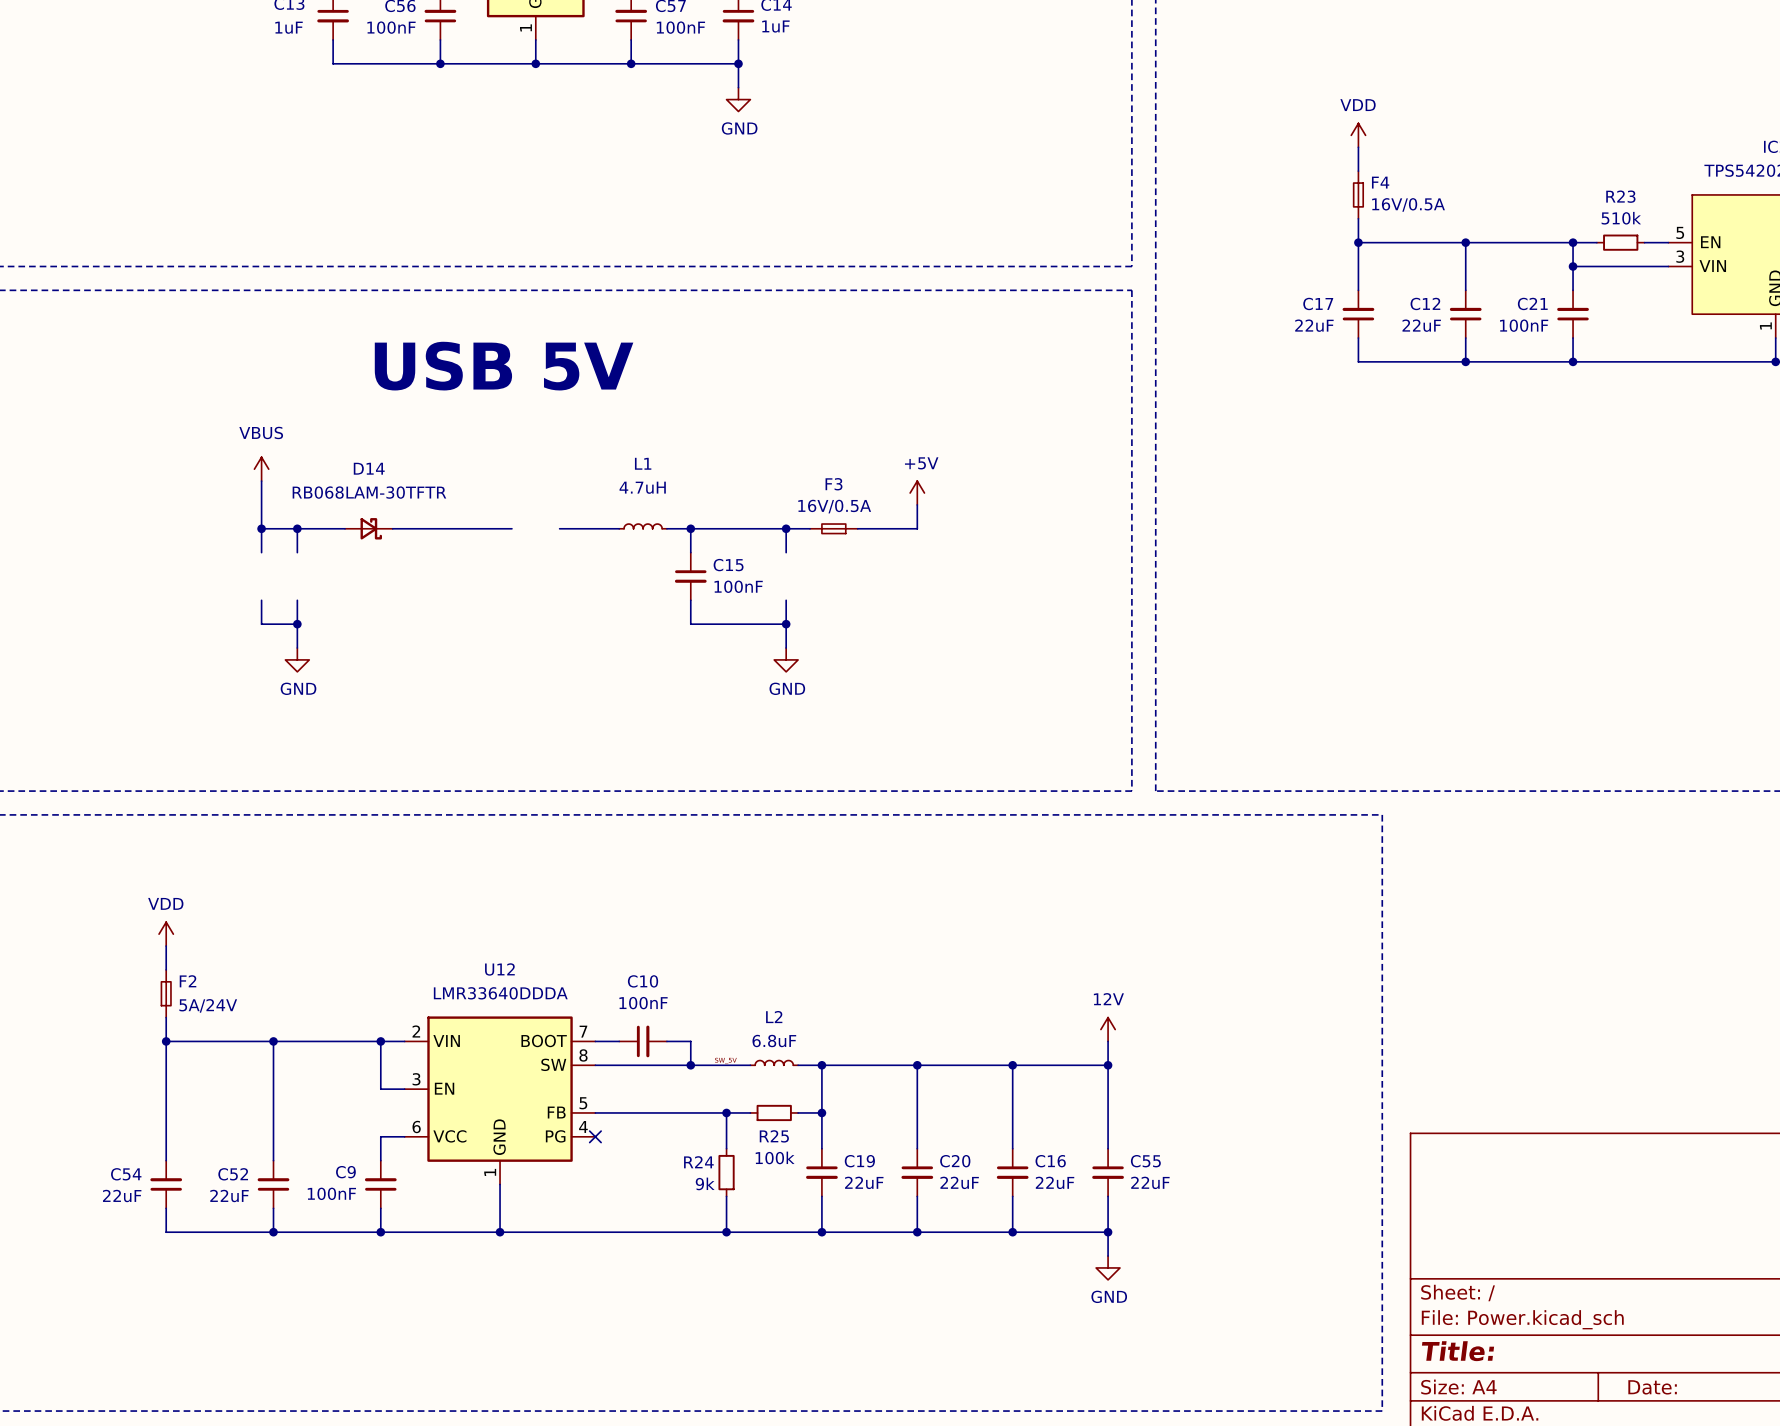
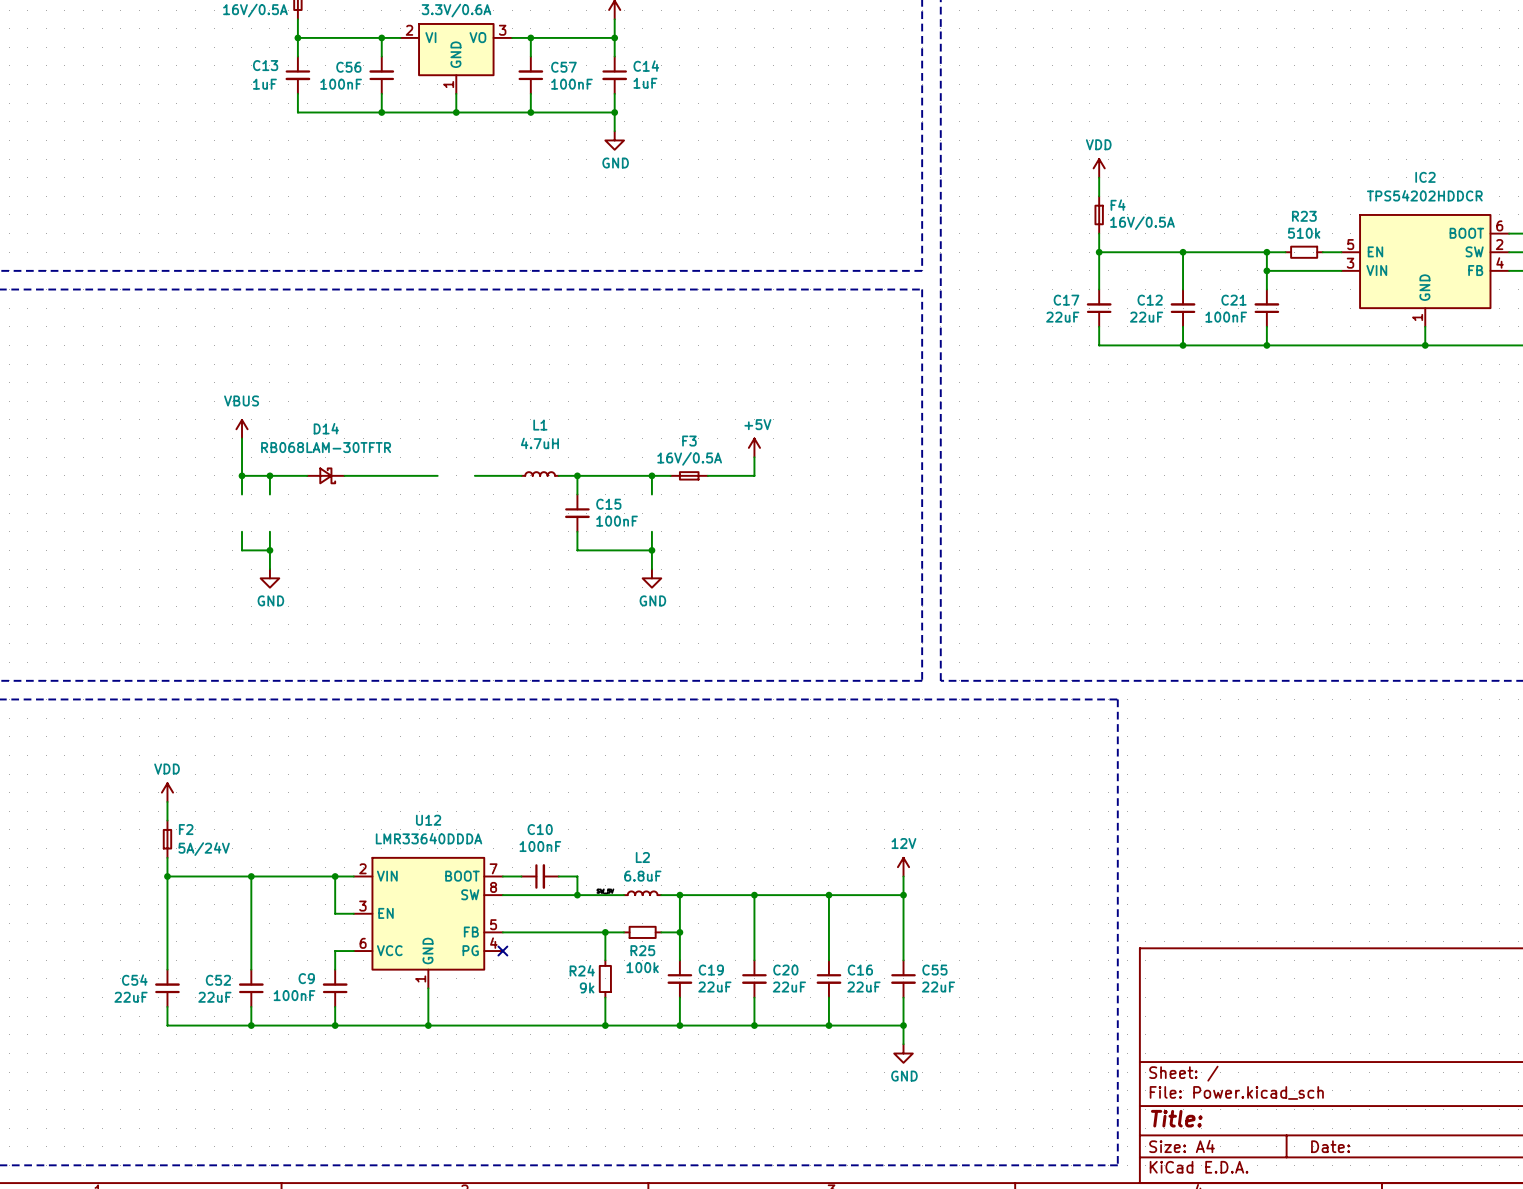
text: USB 5V (504, 366) -> none

